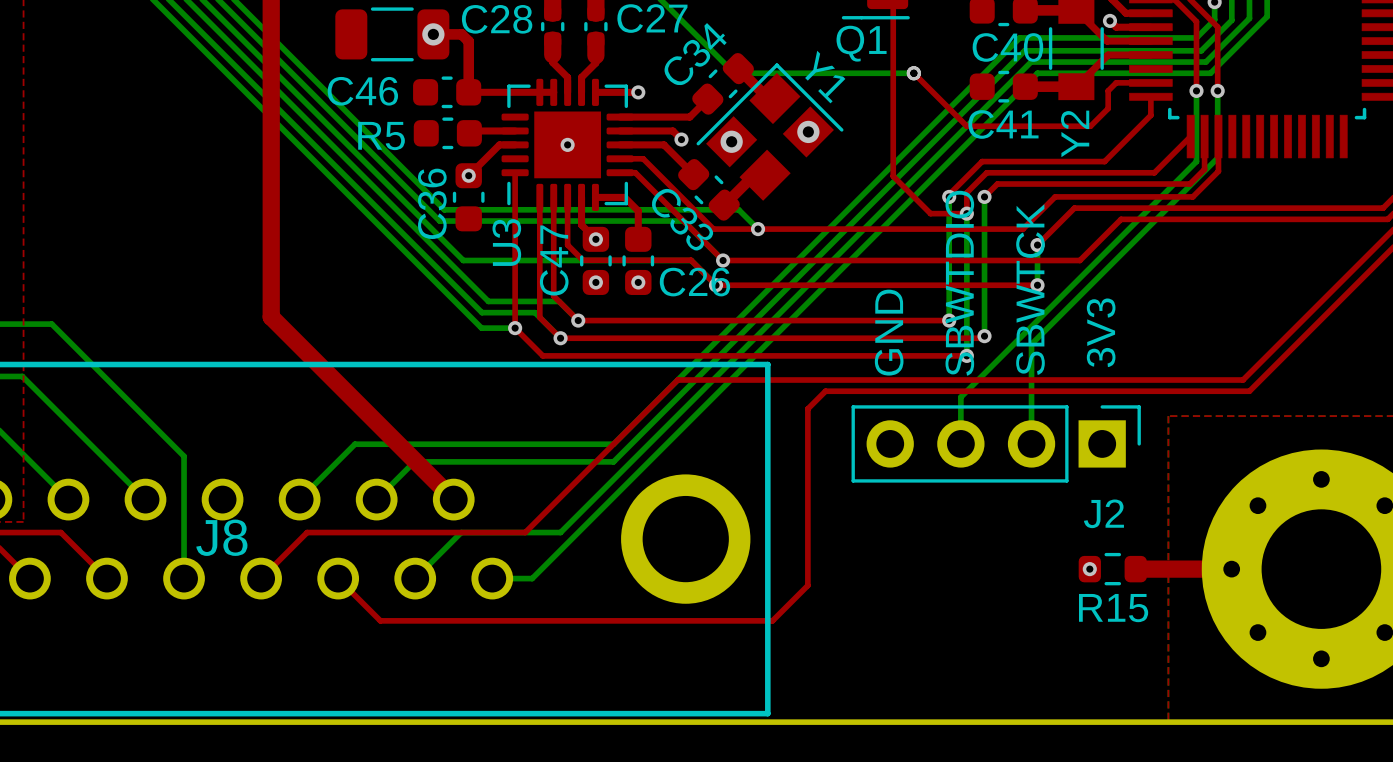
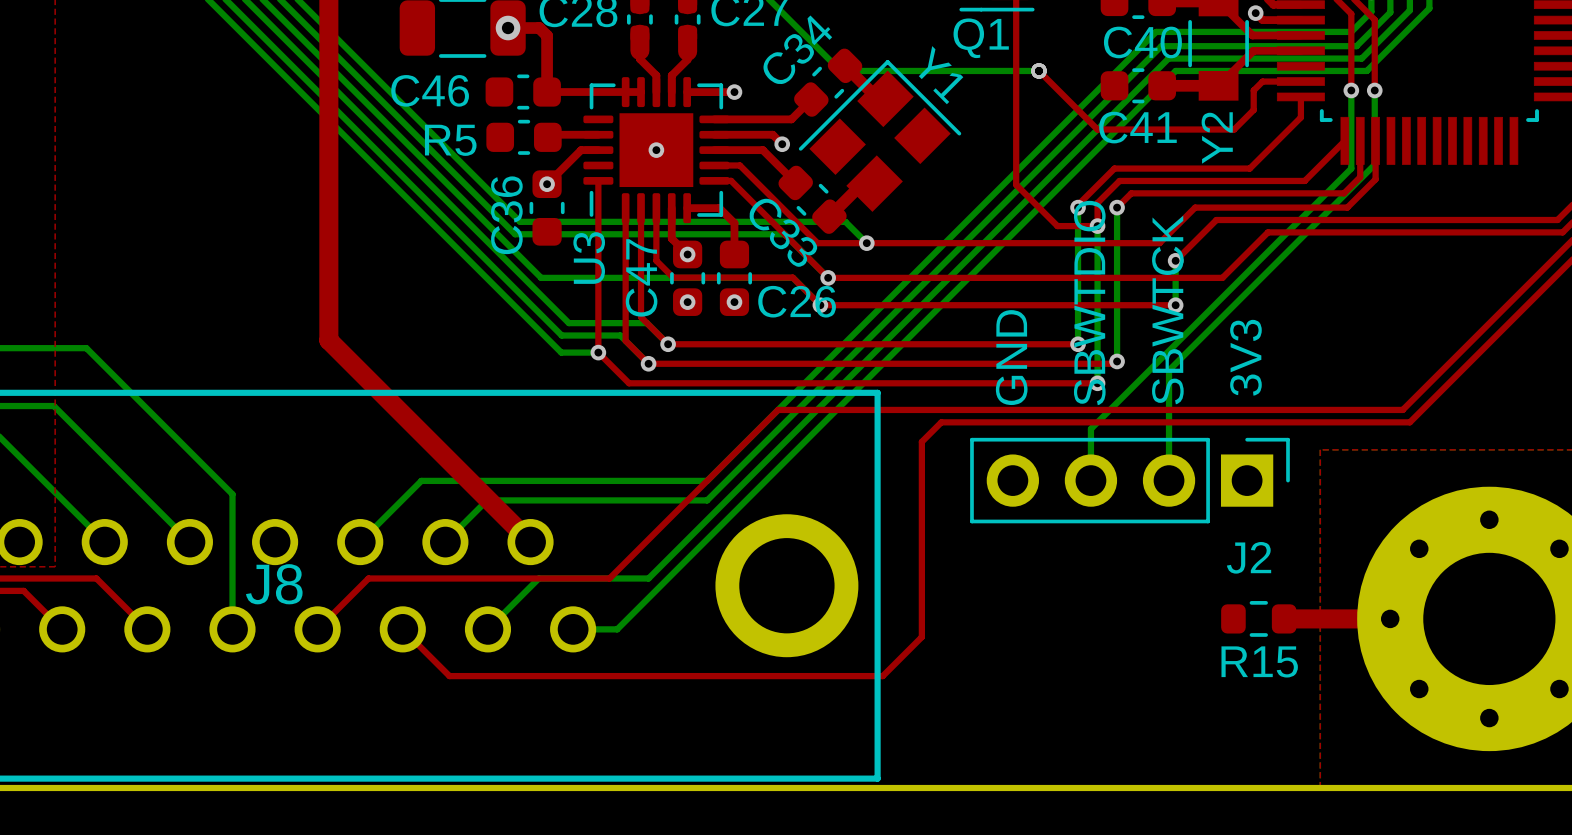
via: (808, 131) -> none
via: (731, 141) -> none
via: (1089, 569) -> none

